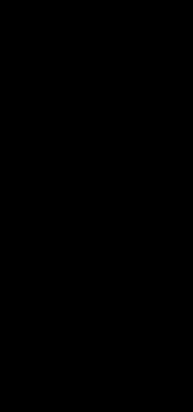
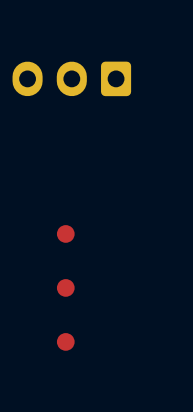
part: none -> (71, 78)
part: none -> (65, 233)
part: none -> (65, 287)
part: none -> (65, 341)

